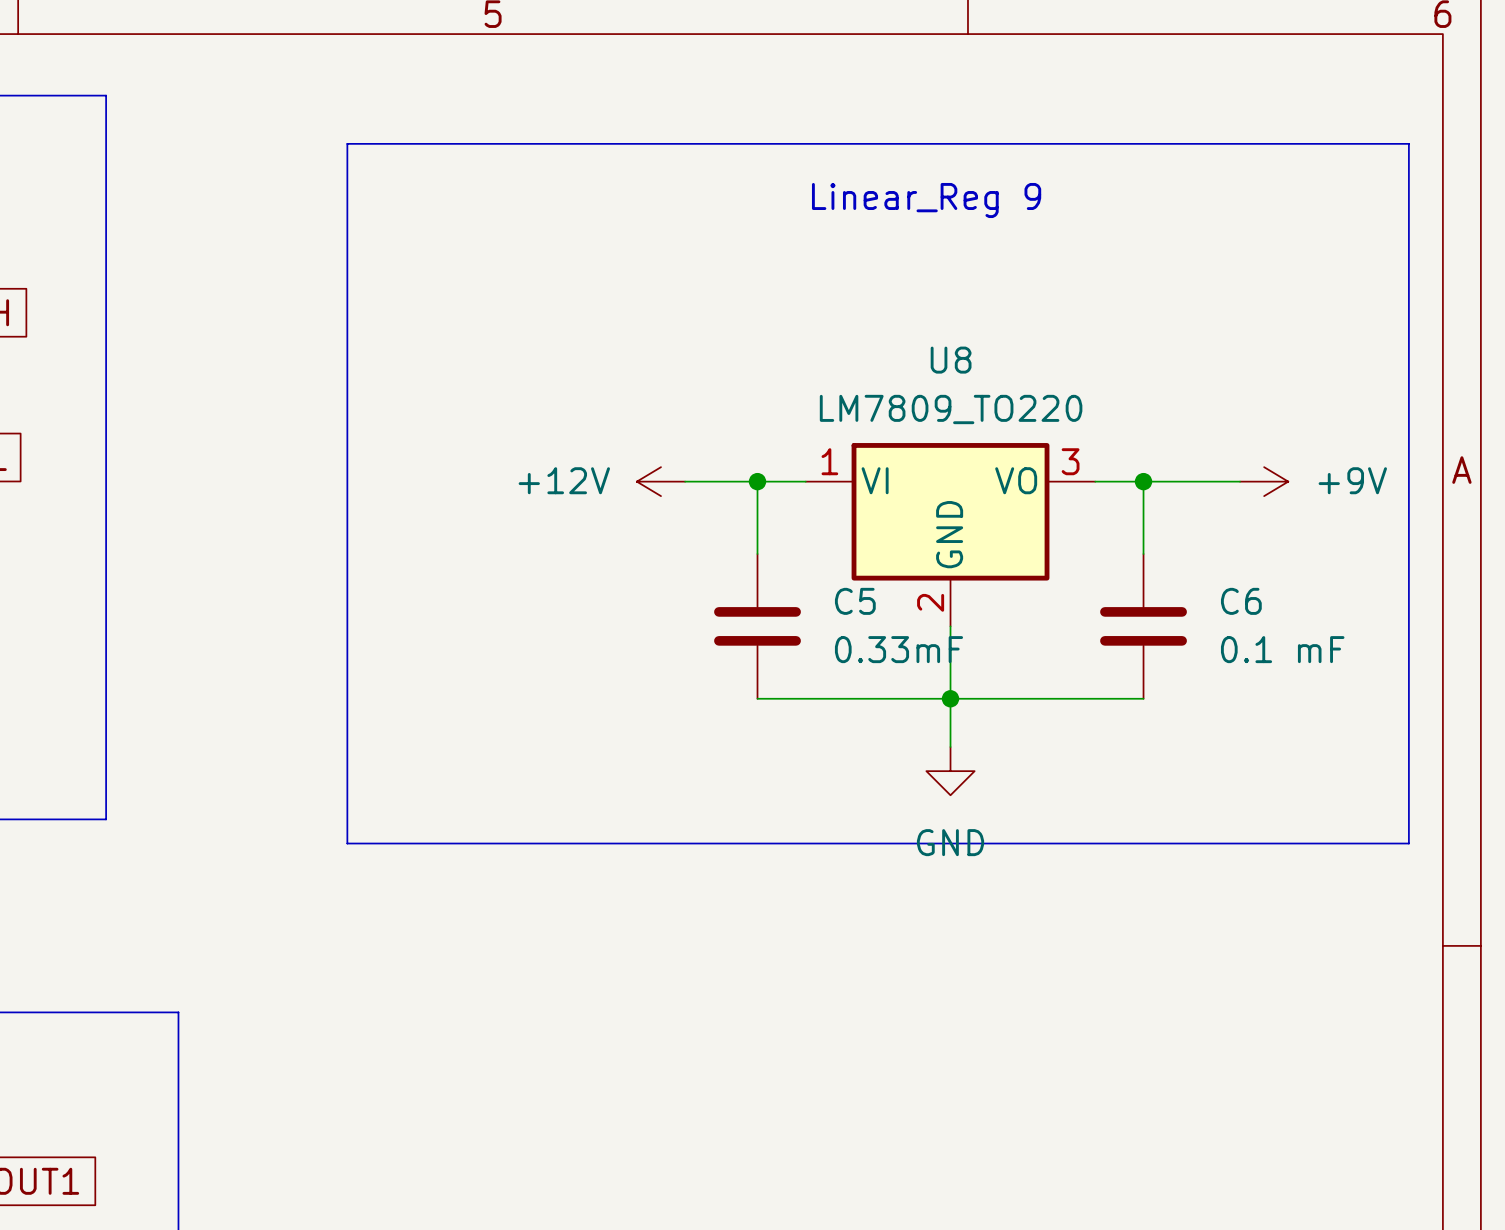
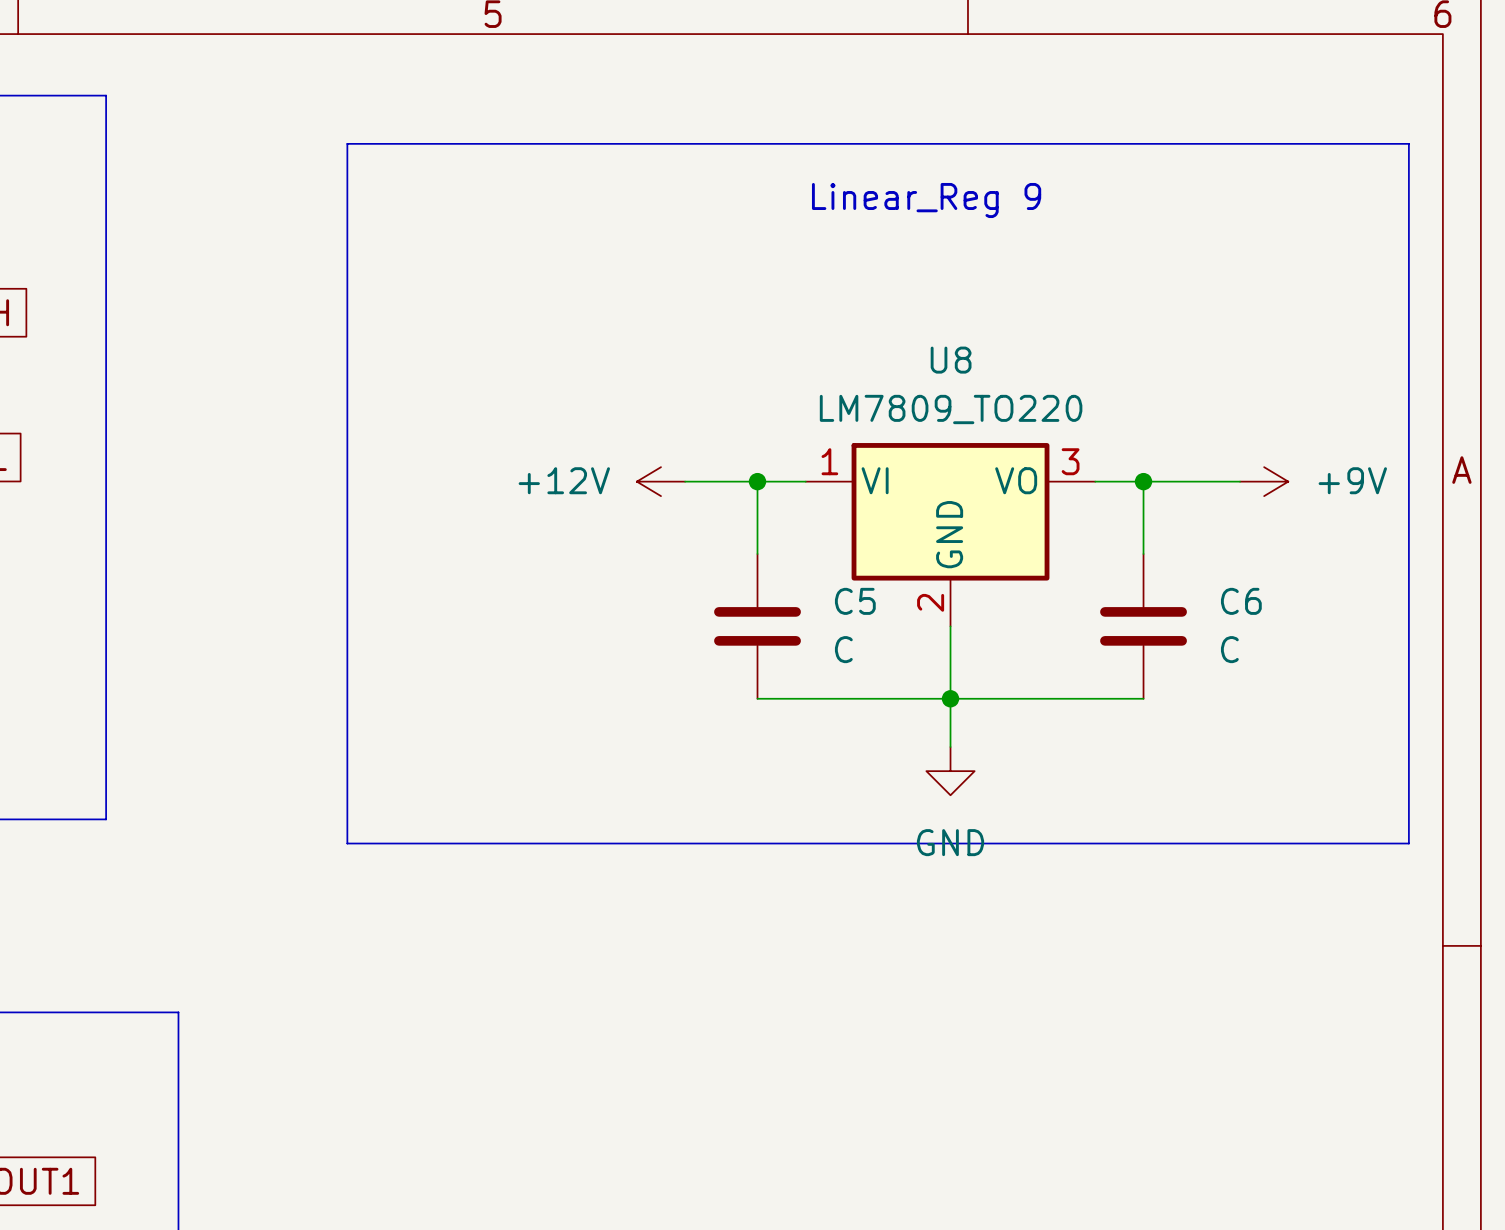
C5 value: 0.33mF (898, 649) -> C (843, 649)
C6 value: 0.1 mF (1282, 649) -> C (1229, 649)

